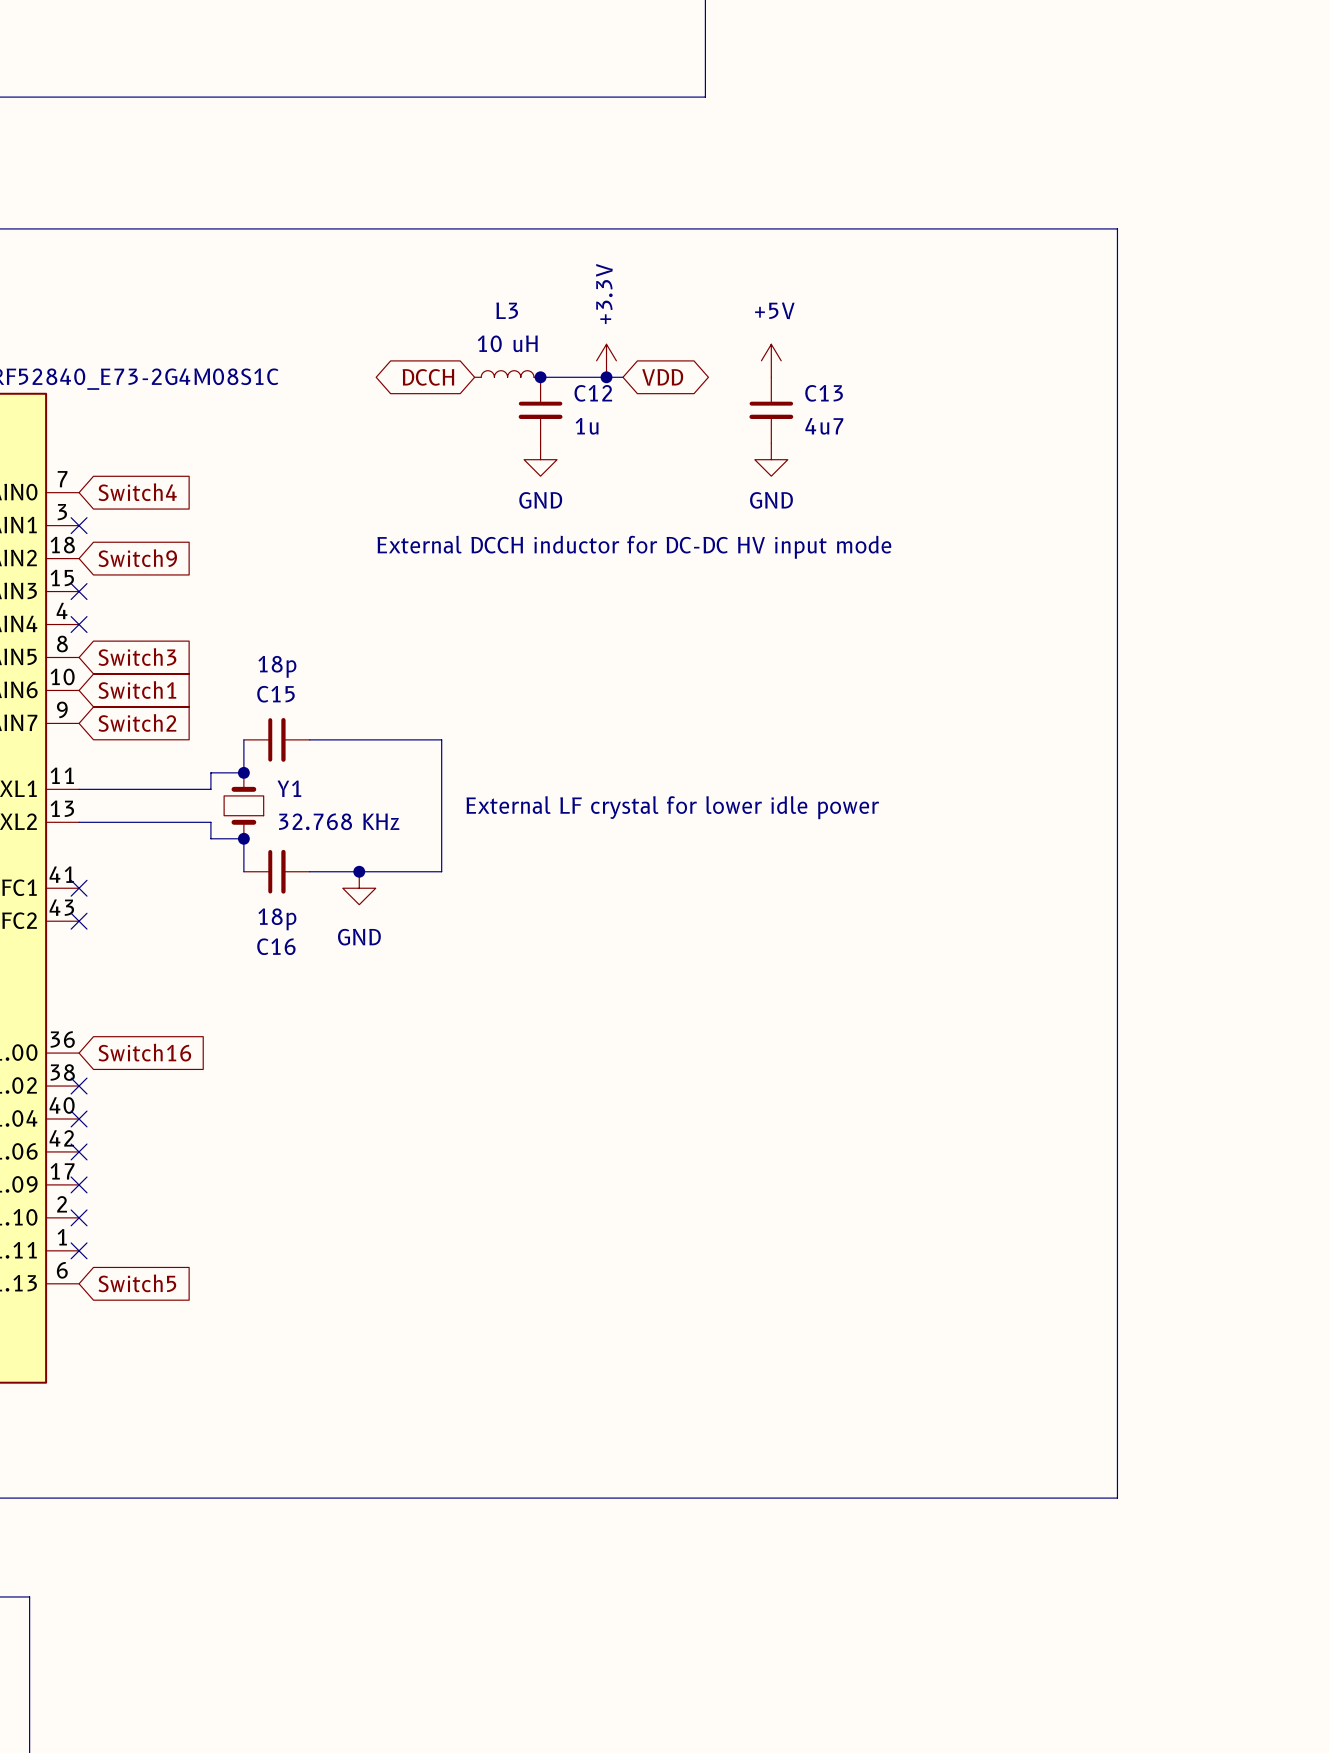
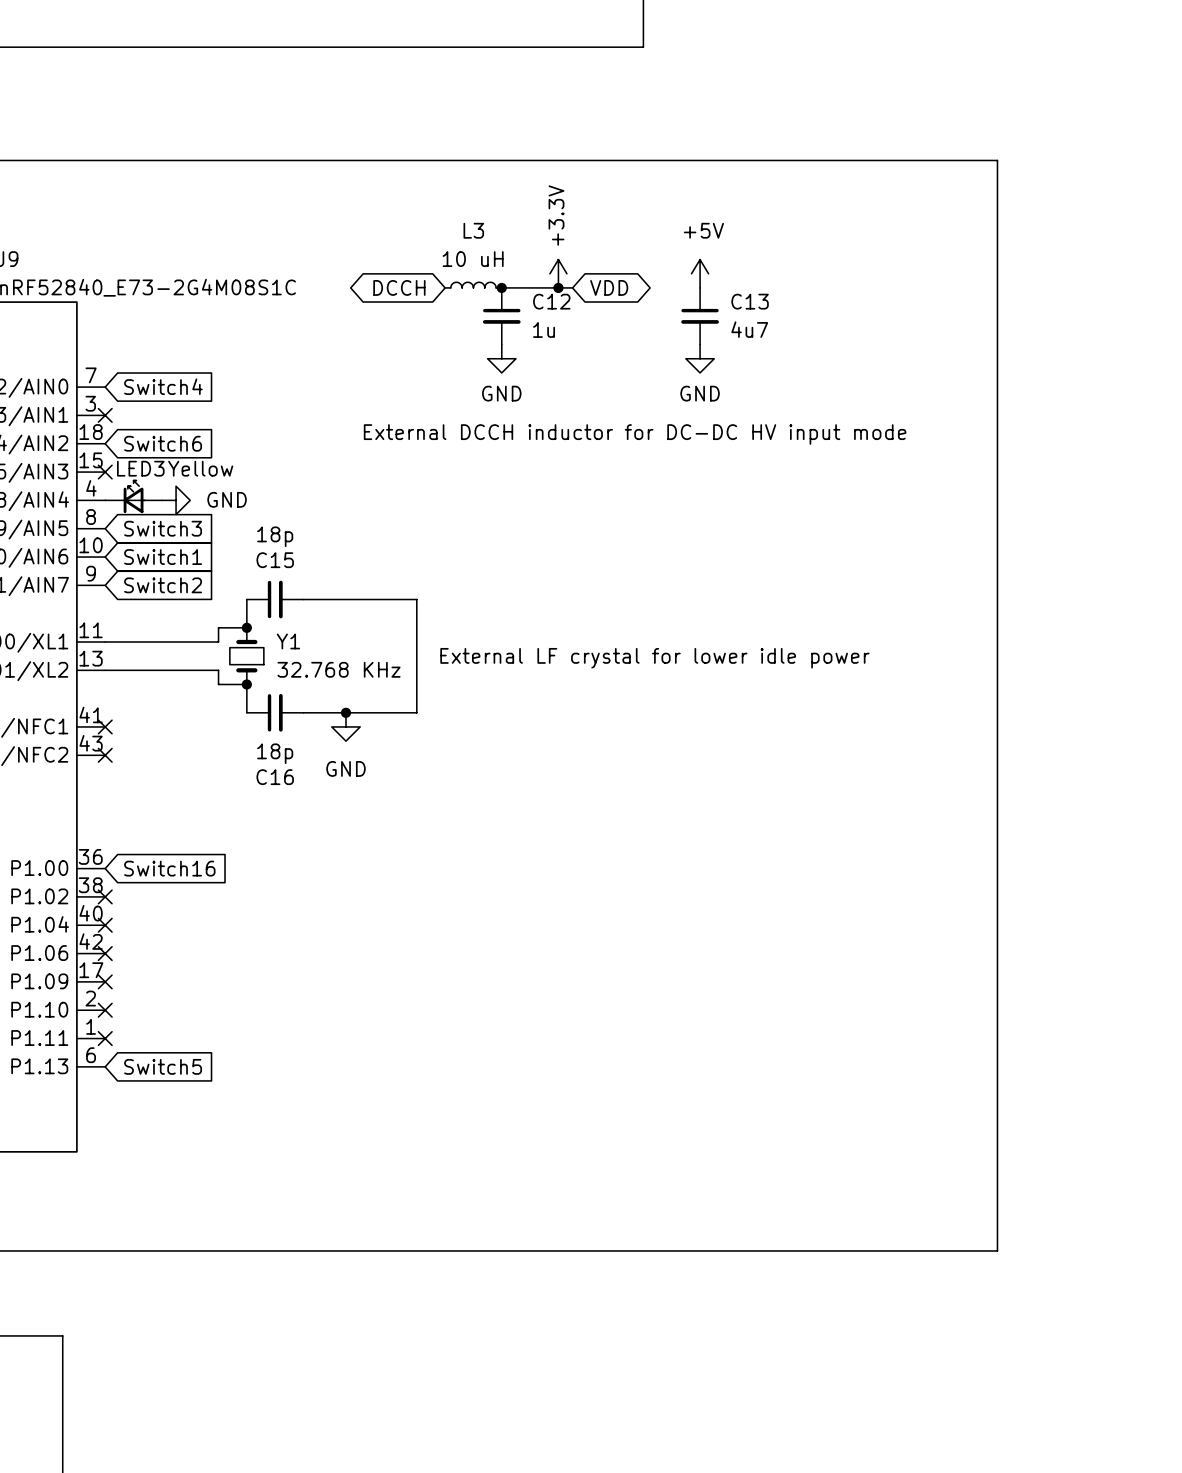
global label: Switch9 (137, 558) -> Switch6 (163, 443)
LED3: none -> Yellow (133, 496)
no-connect mark: (79, 624) -> none
power symbol: none -> GND (176, 500)

